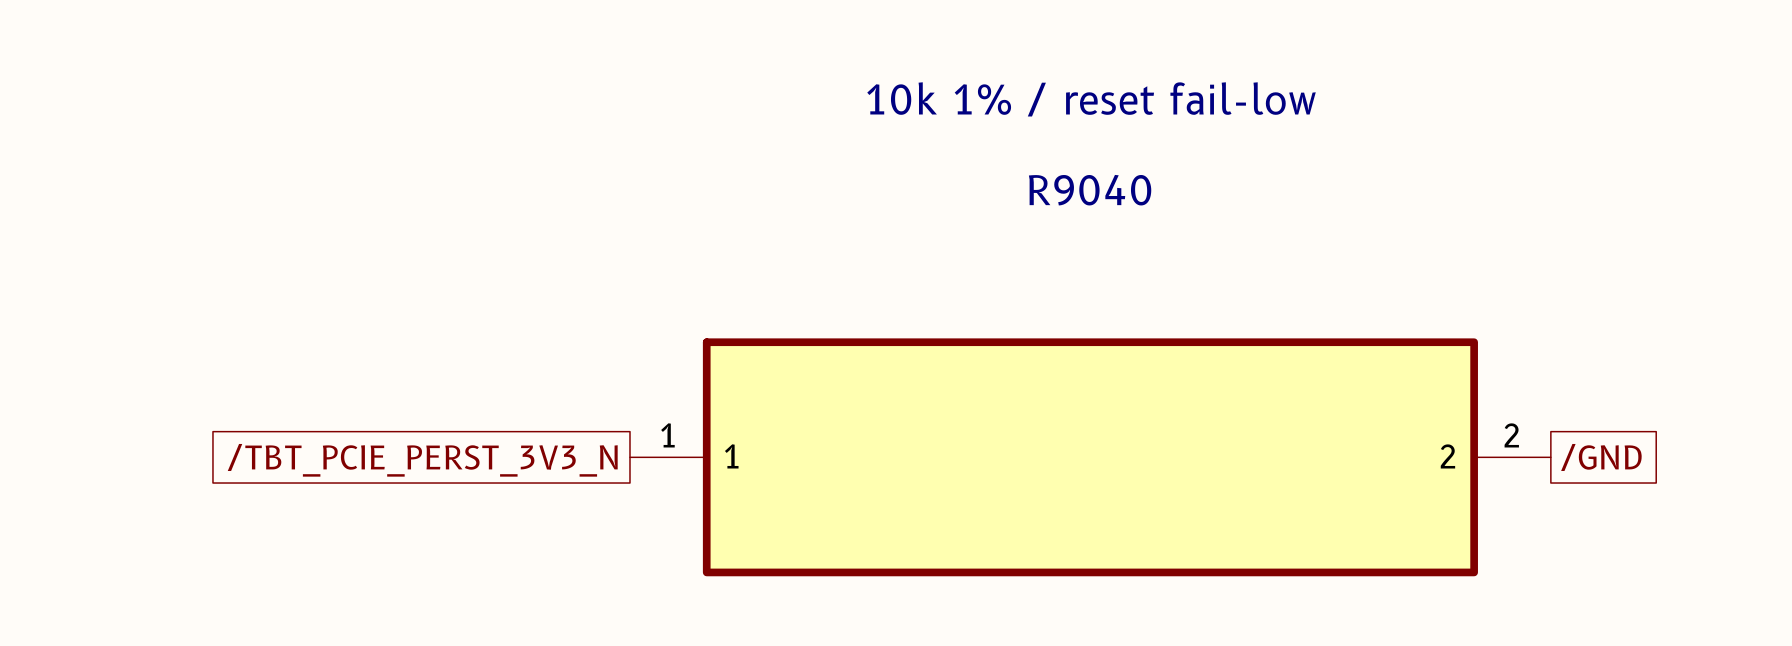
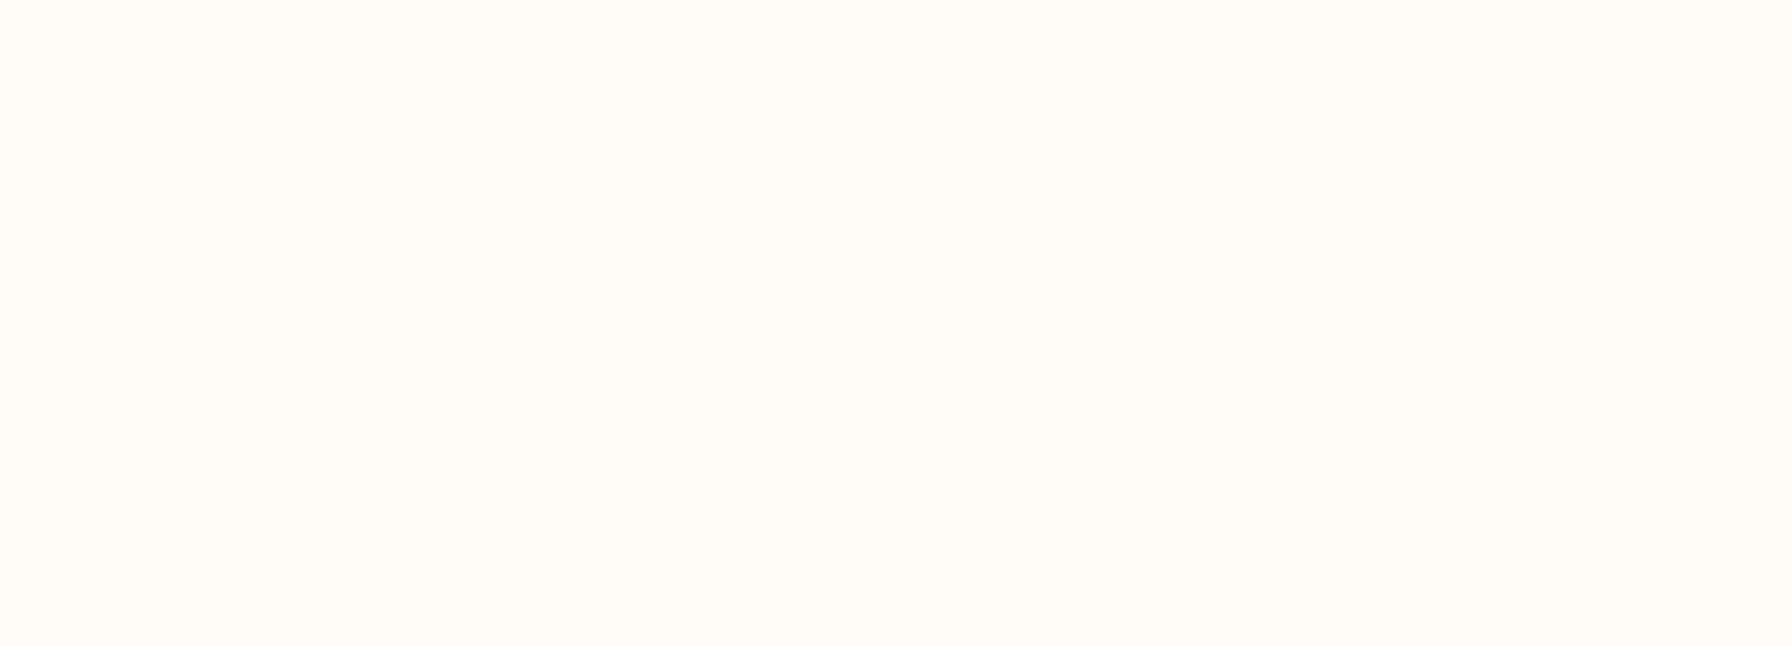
R9040: 10k 1% / reset fail-low (1090, 457) -> none
global label: /GND (1601, 457) -> none
global label: /TBT_PCIE_PERST_3V3_N (422, 460) -> none

